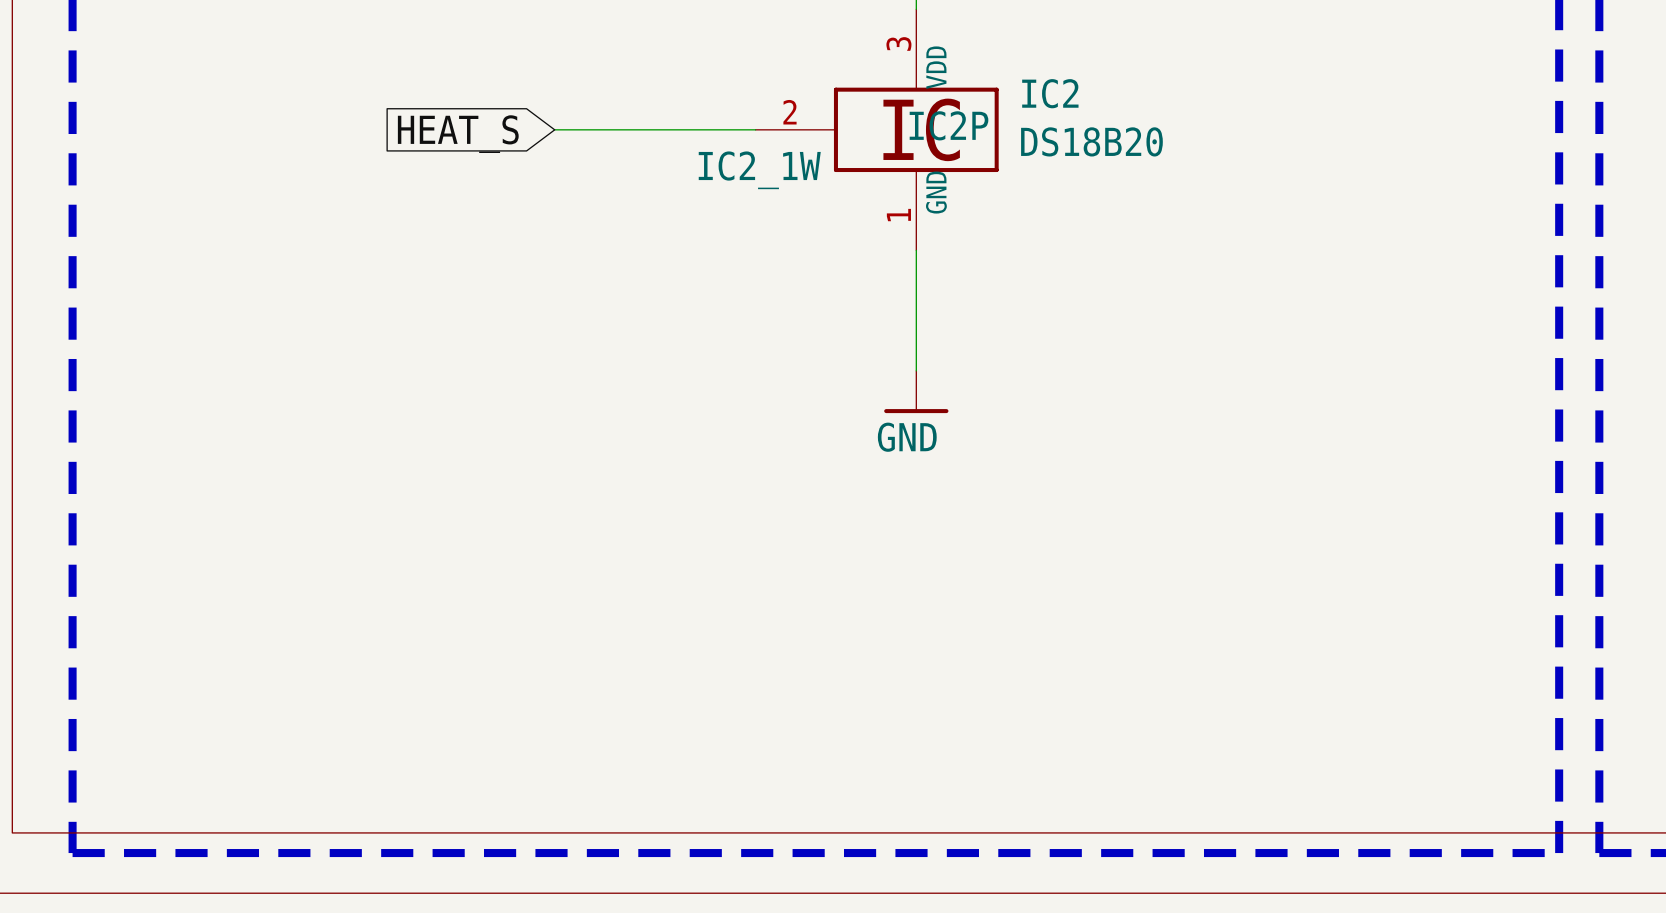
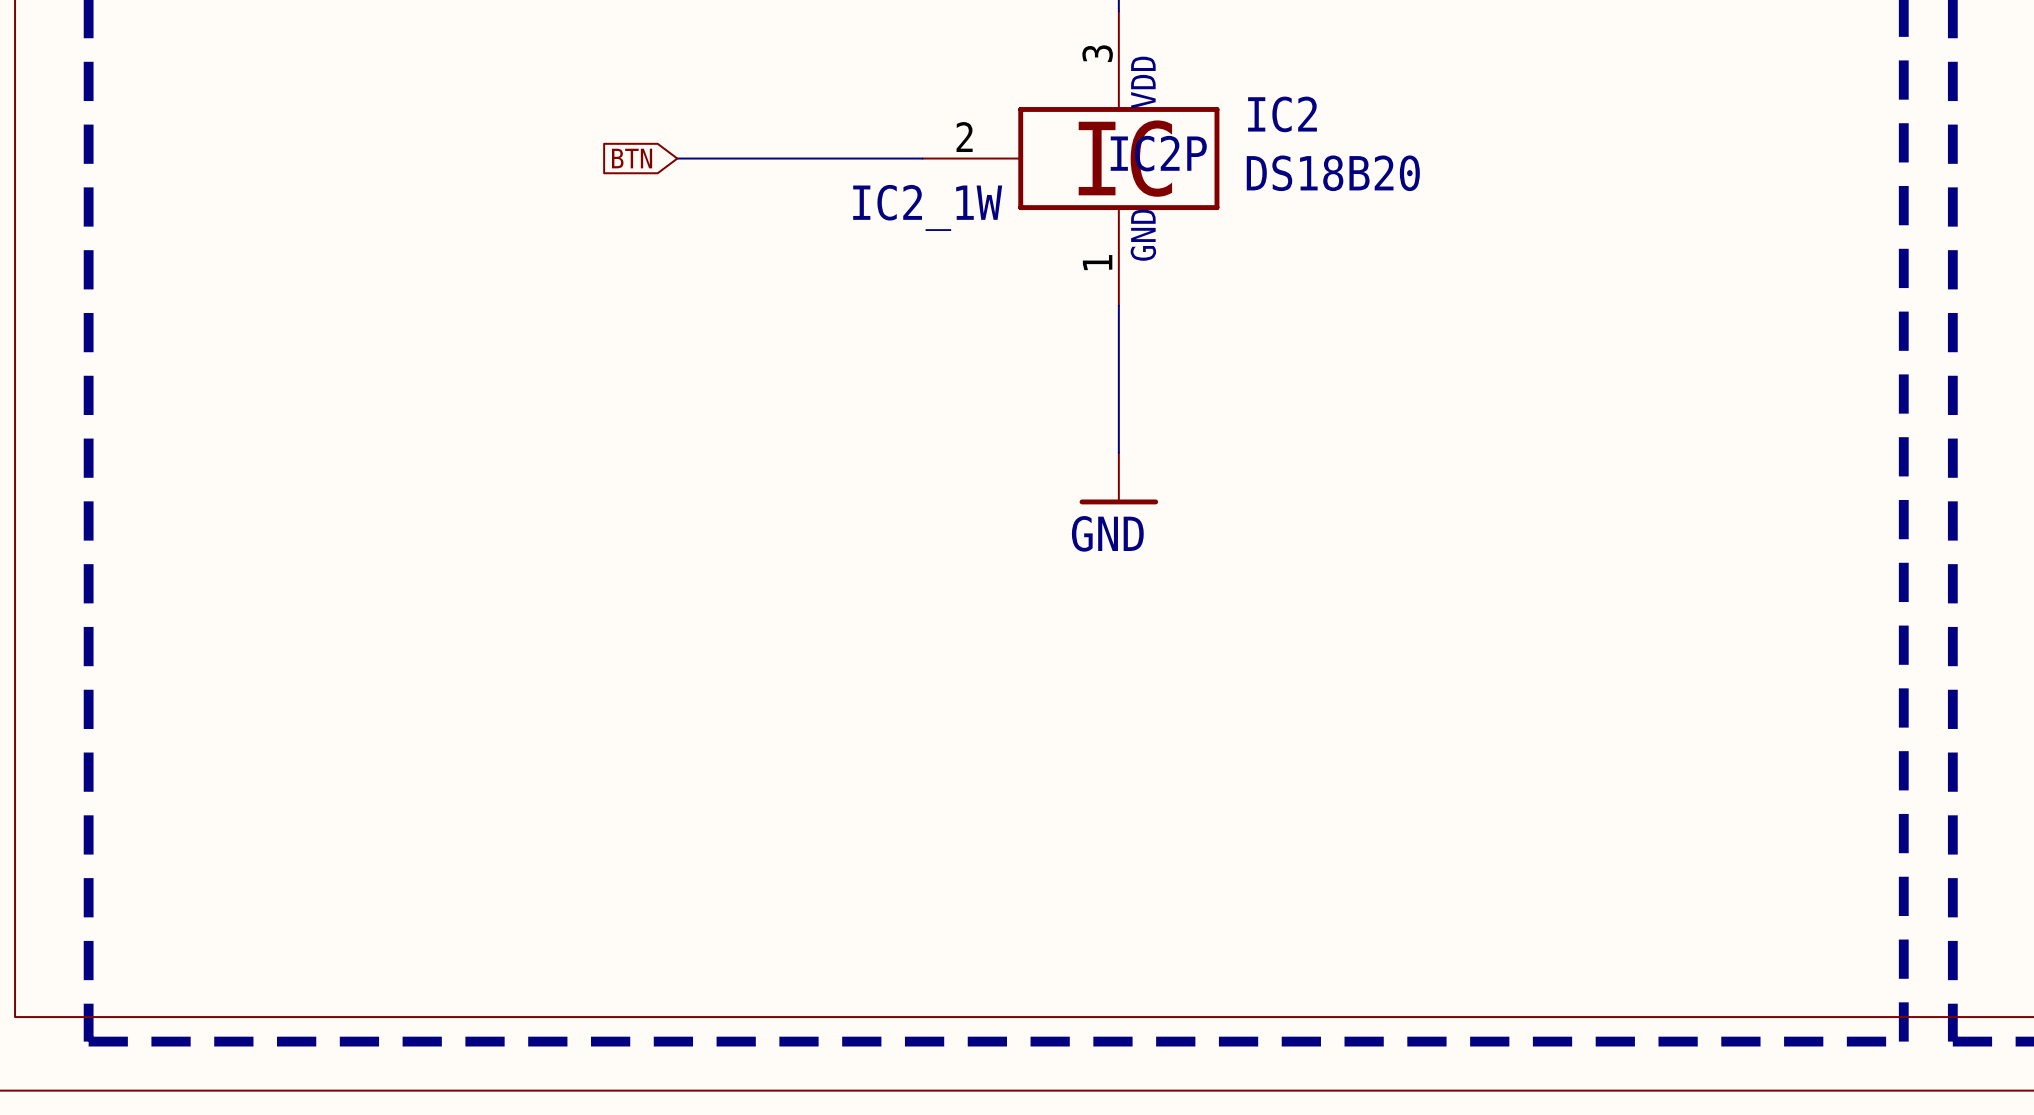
global label: HEAT_S (458, 134) -> BTN (632, 158)

